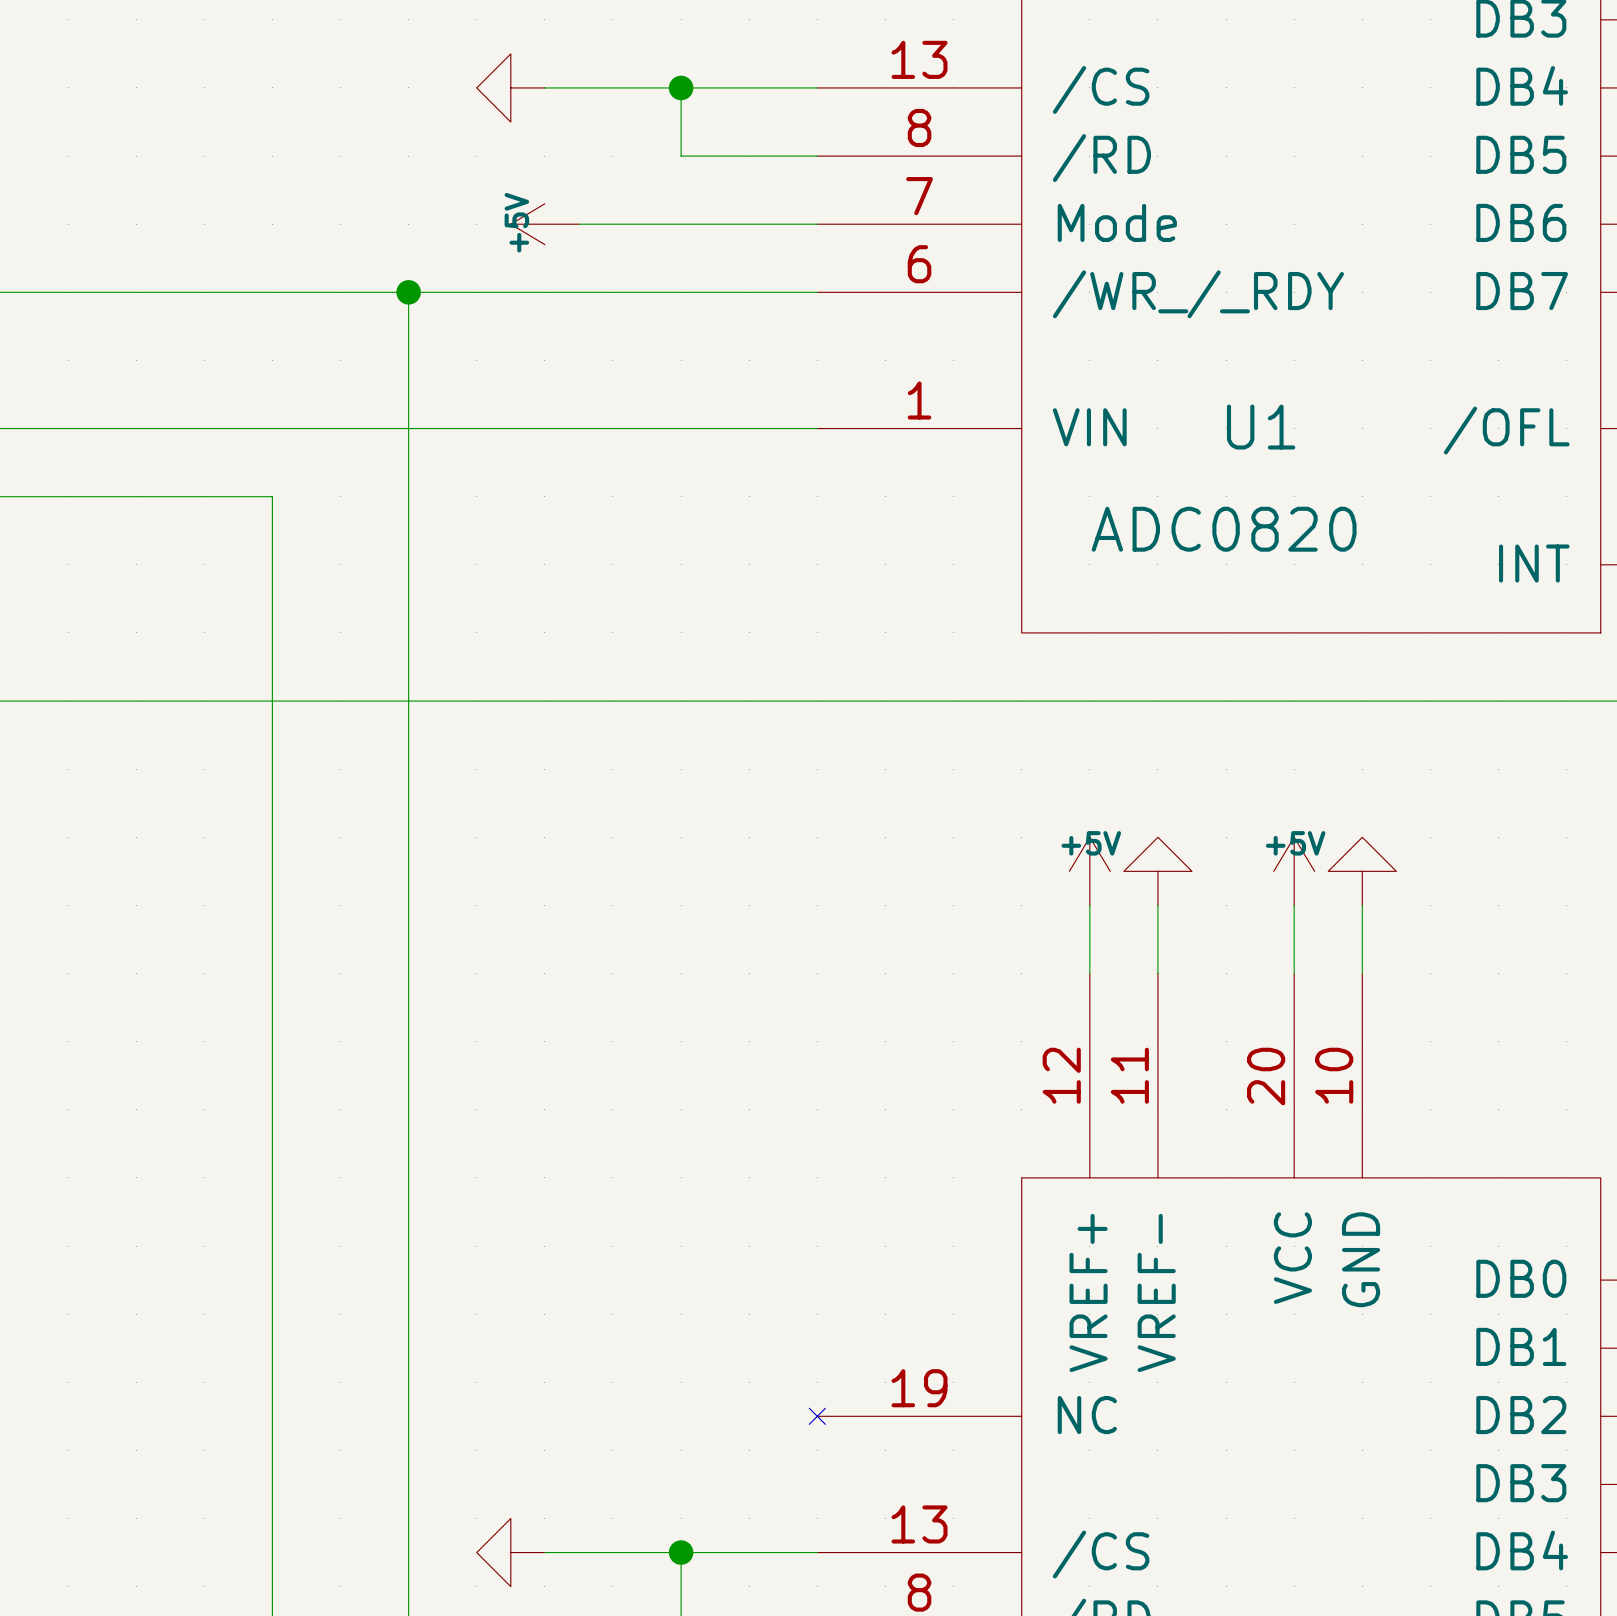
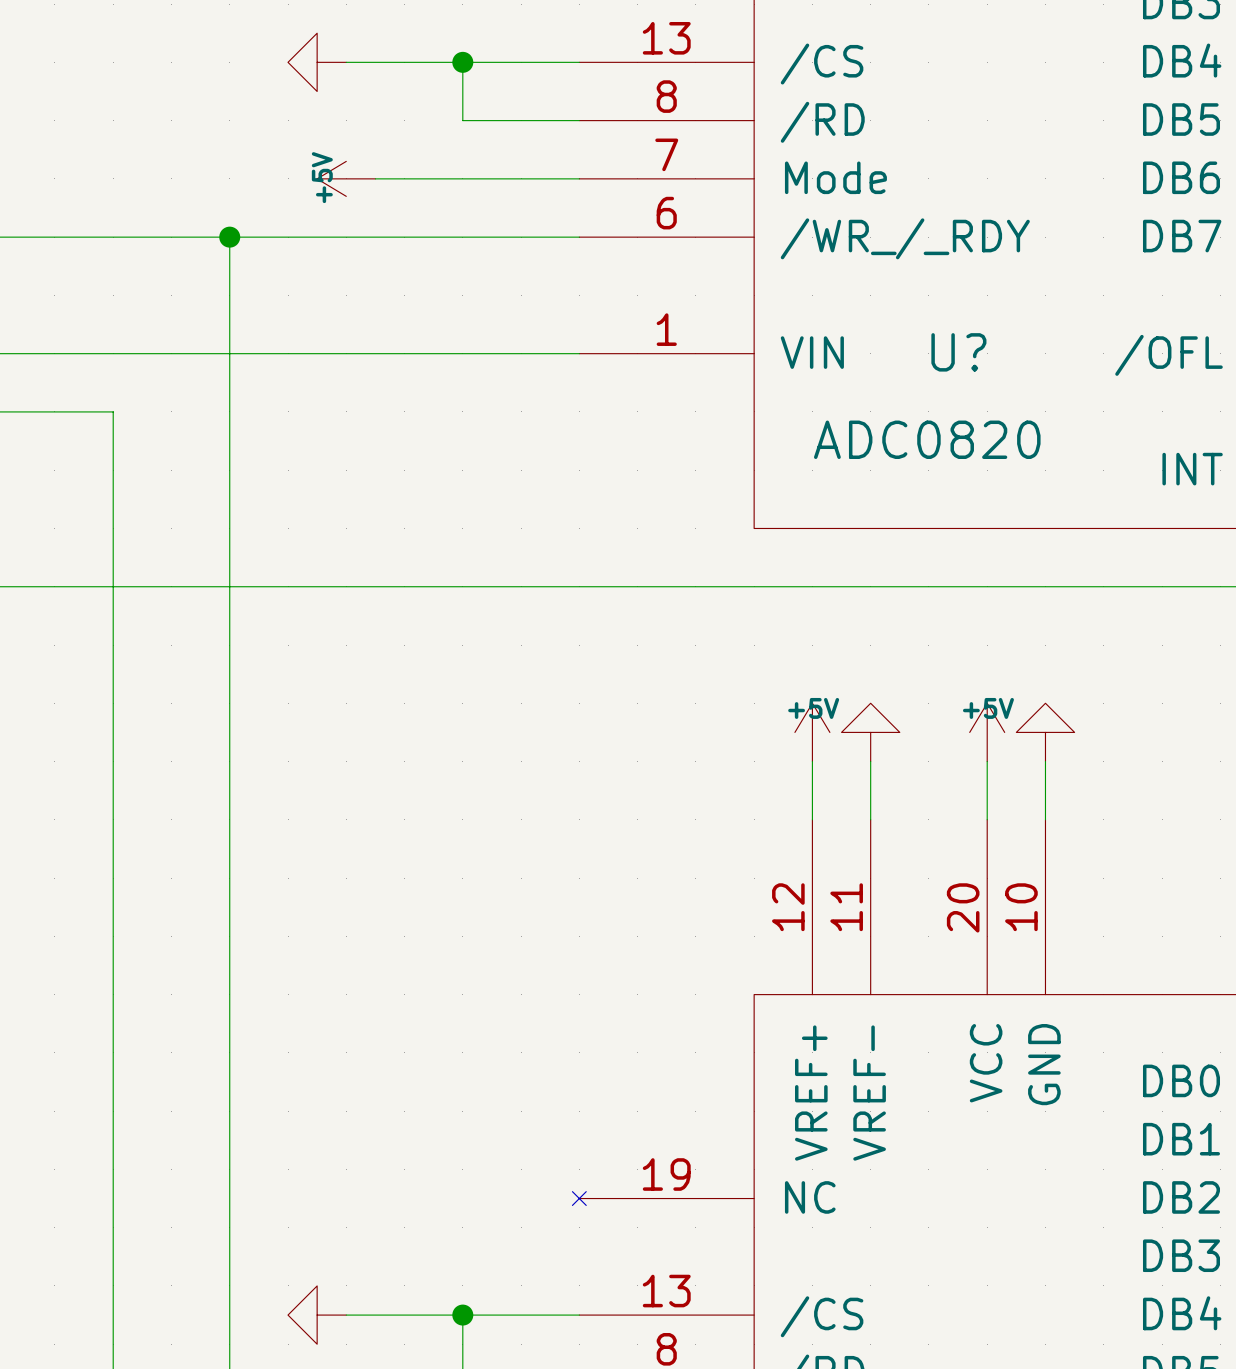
U1 name: U1 (1261, 427) -> U? (958, 352)

